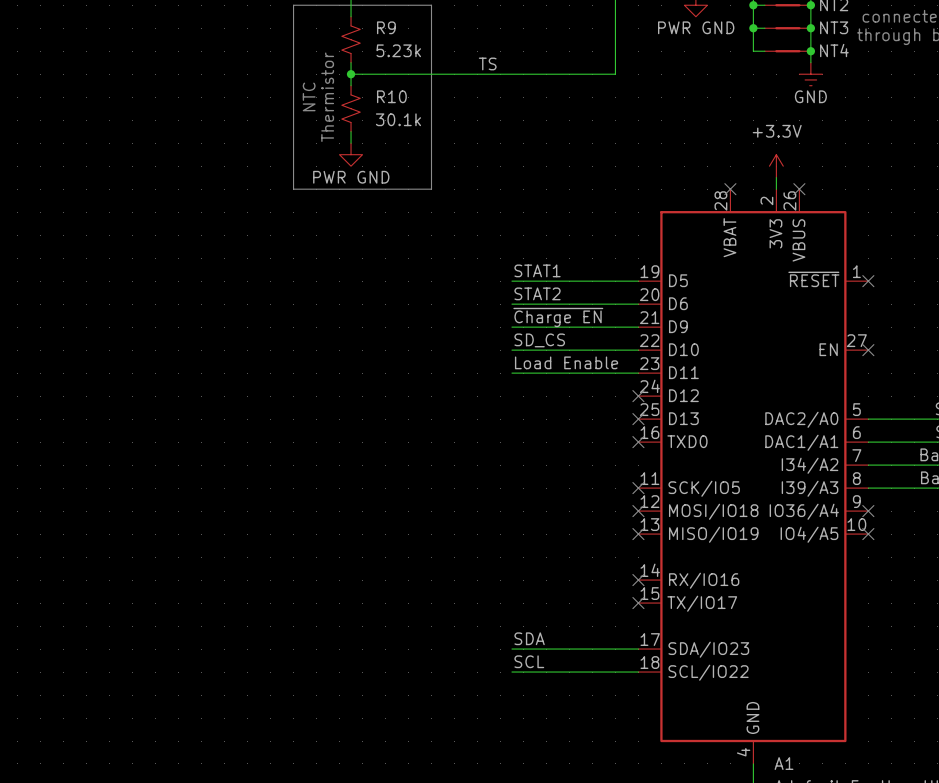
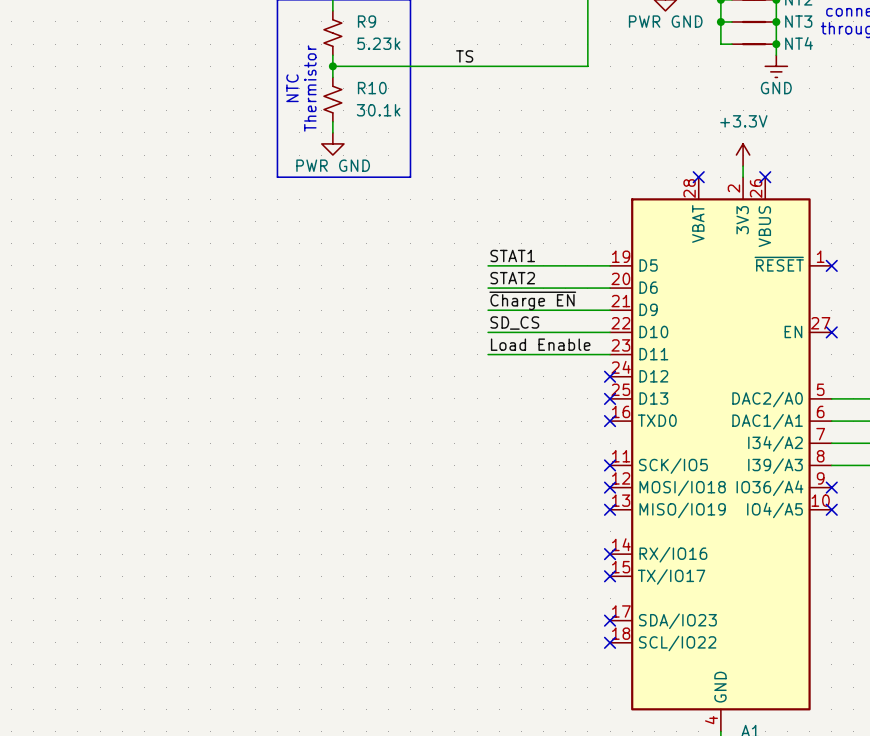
label: SDA (529, 638) -> none
wire: (511, 649) (638, 649) -> none
no-connect mark: none -> (610, 620)
label: SCL (529, 661) -> none
wire: (511, 672) (638, 672) -> none
no-connect mark: none -> (610, 642)

